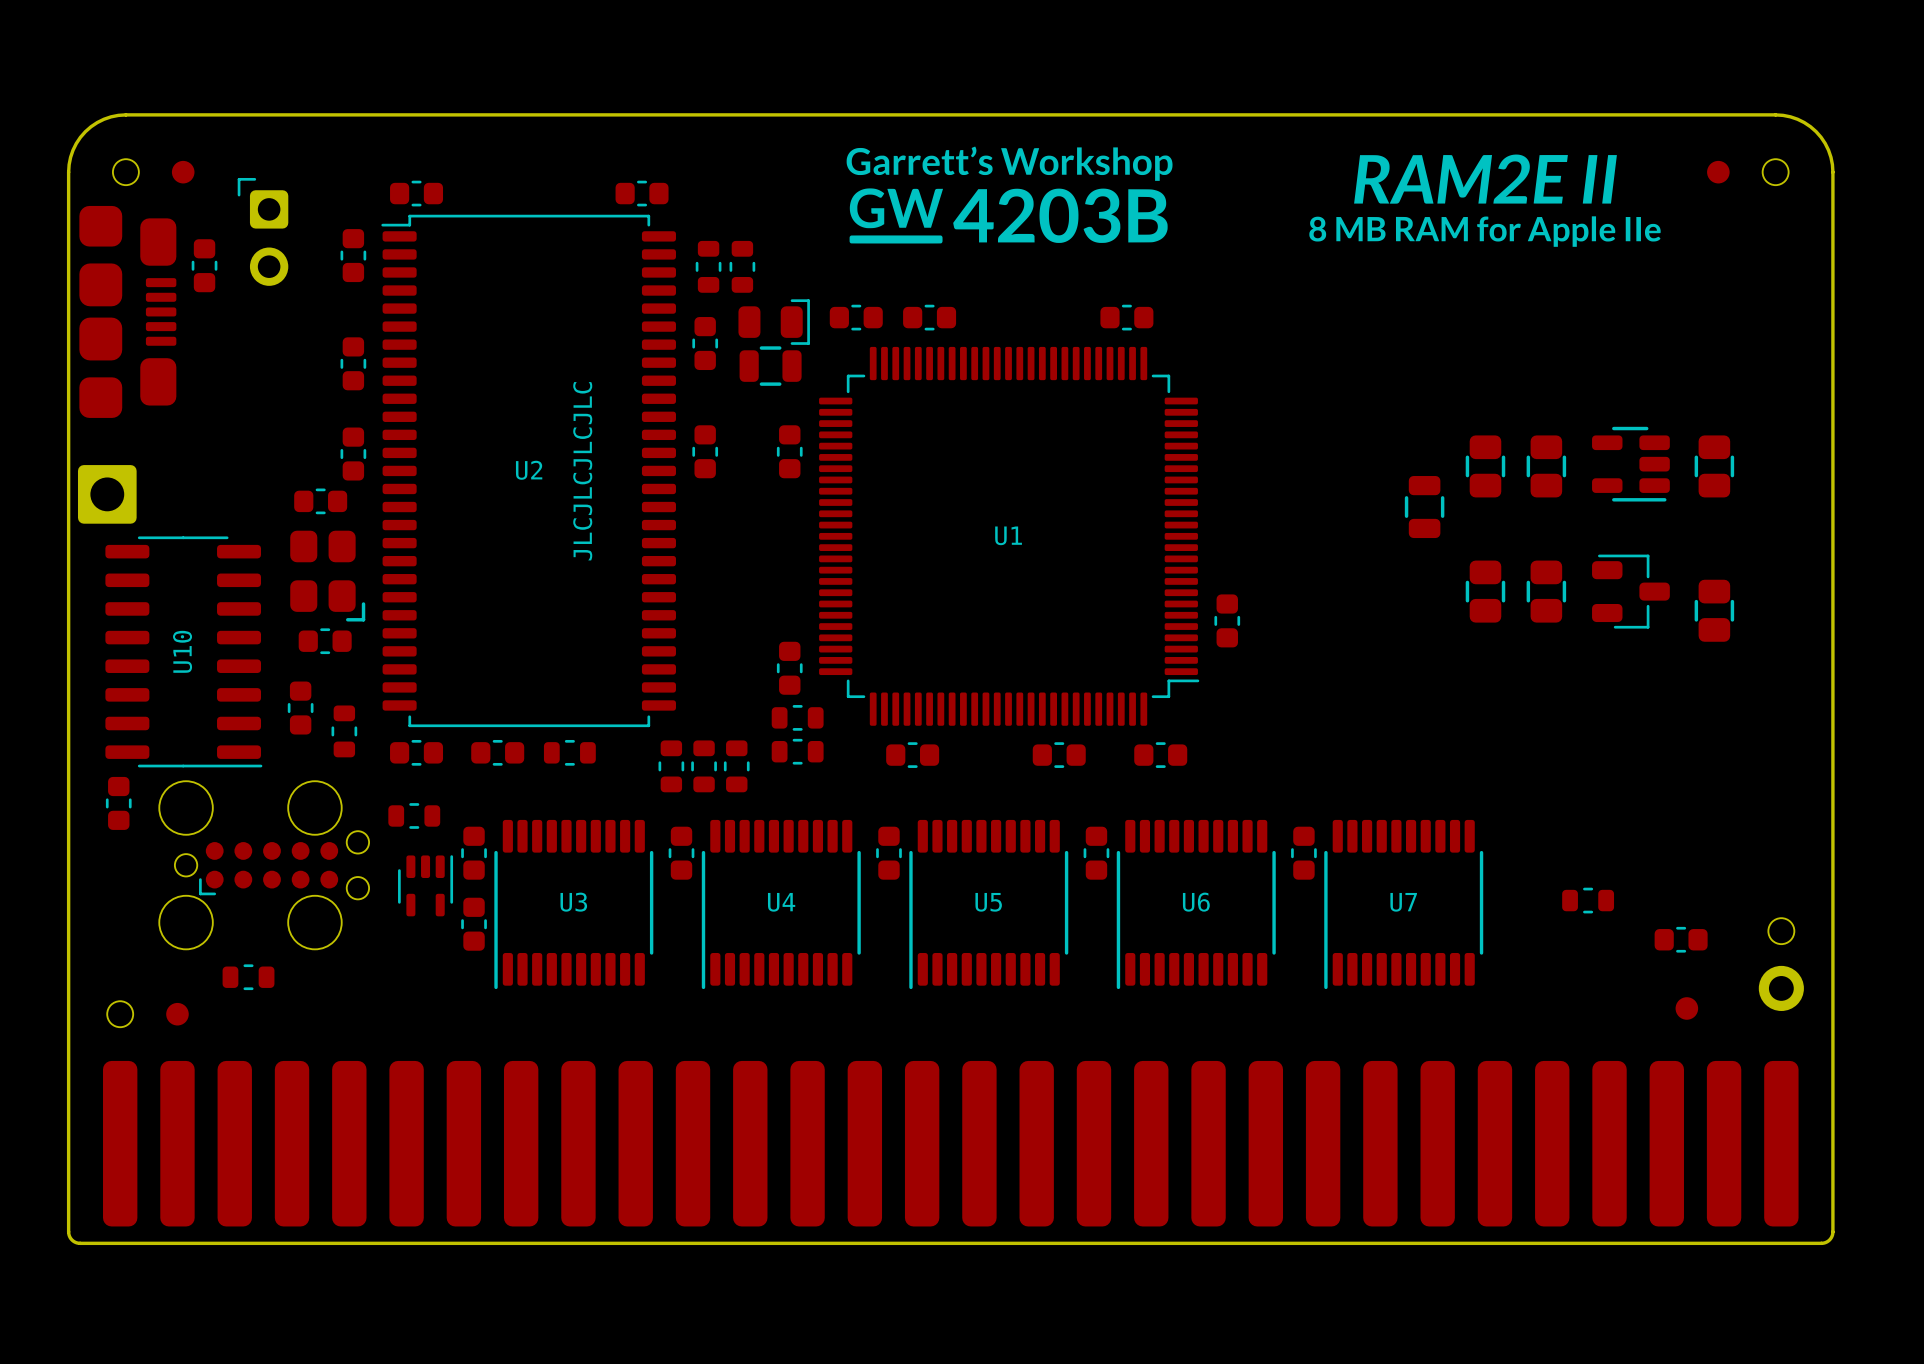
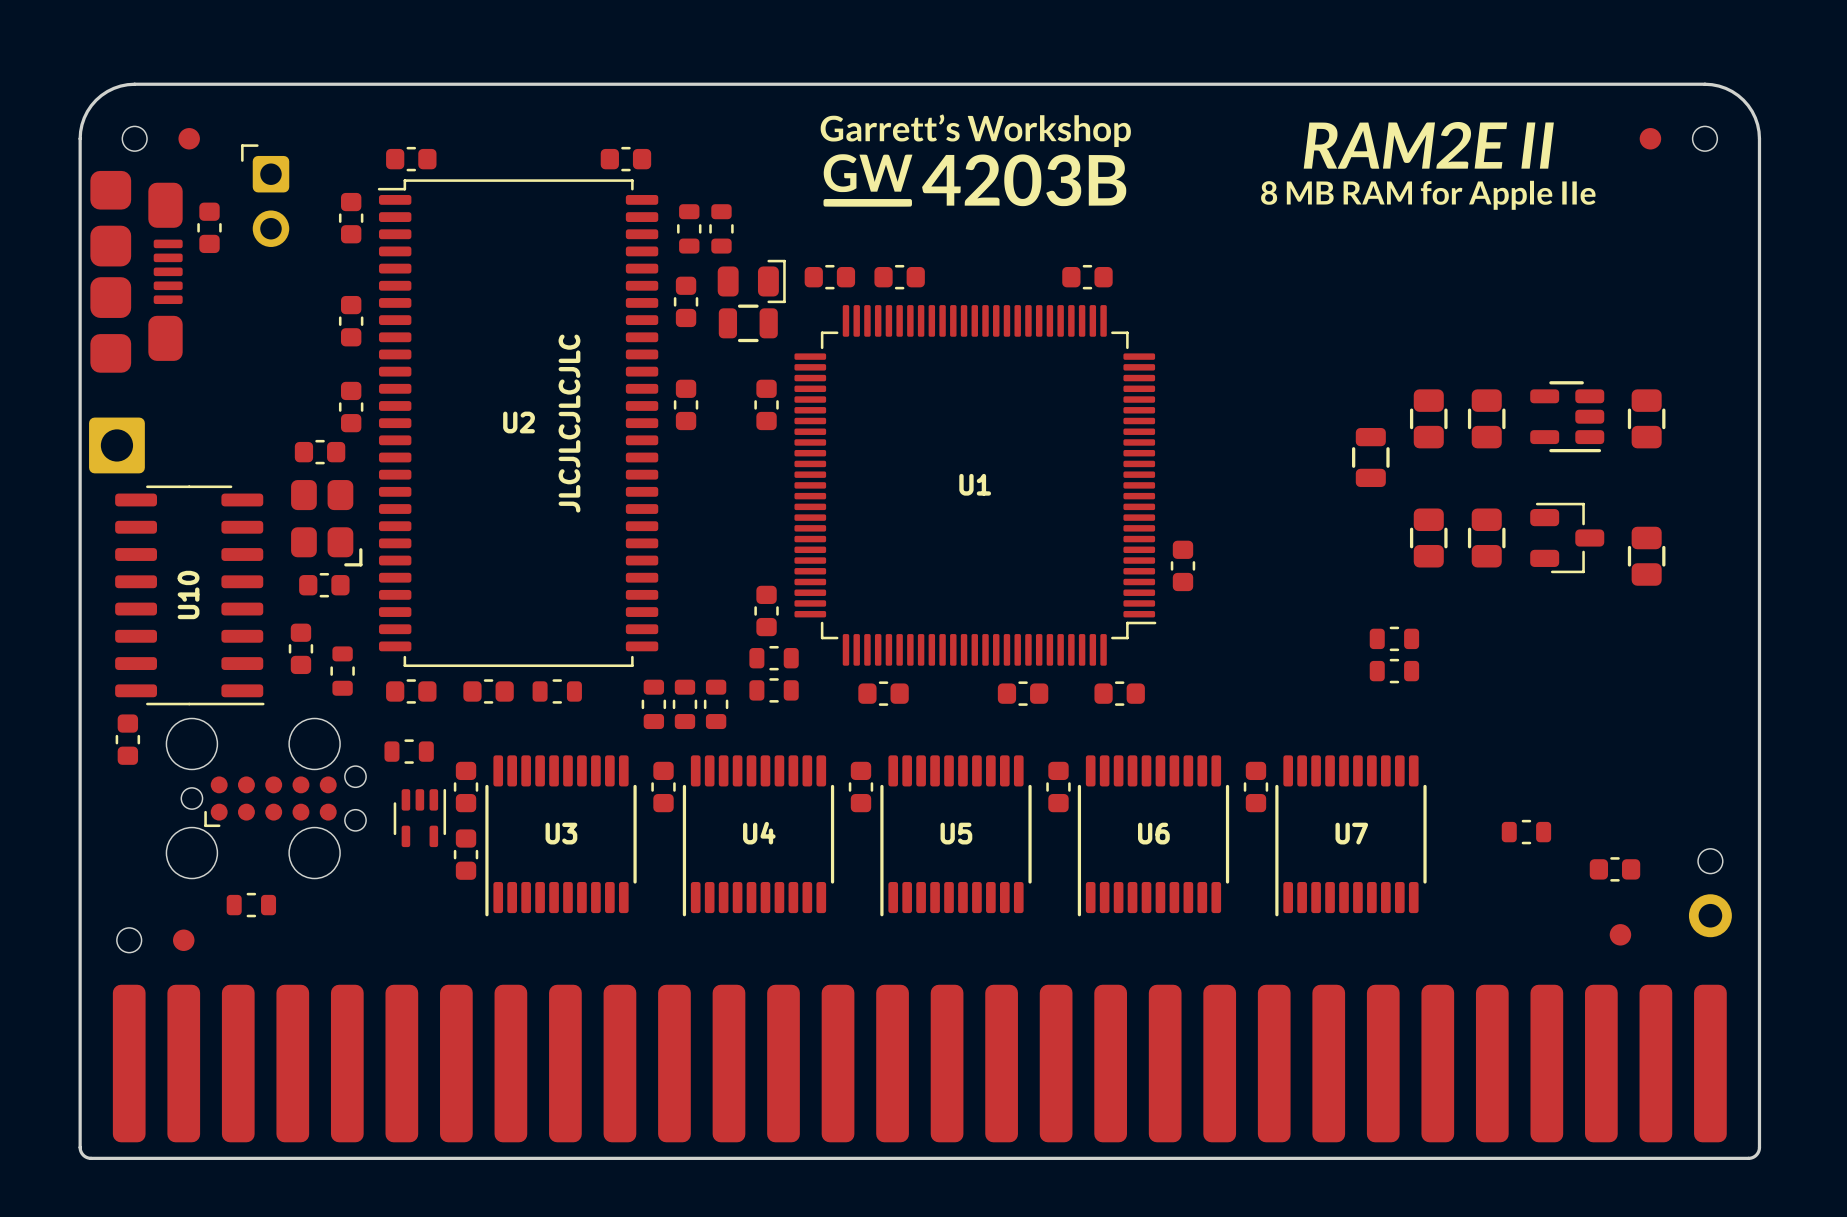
part: none -> (1394, 638)
part: none -> (1394, 671)

